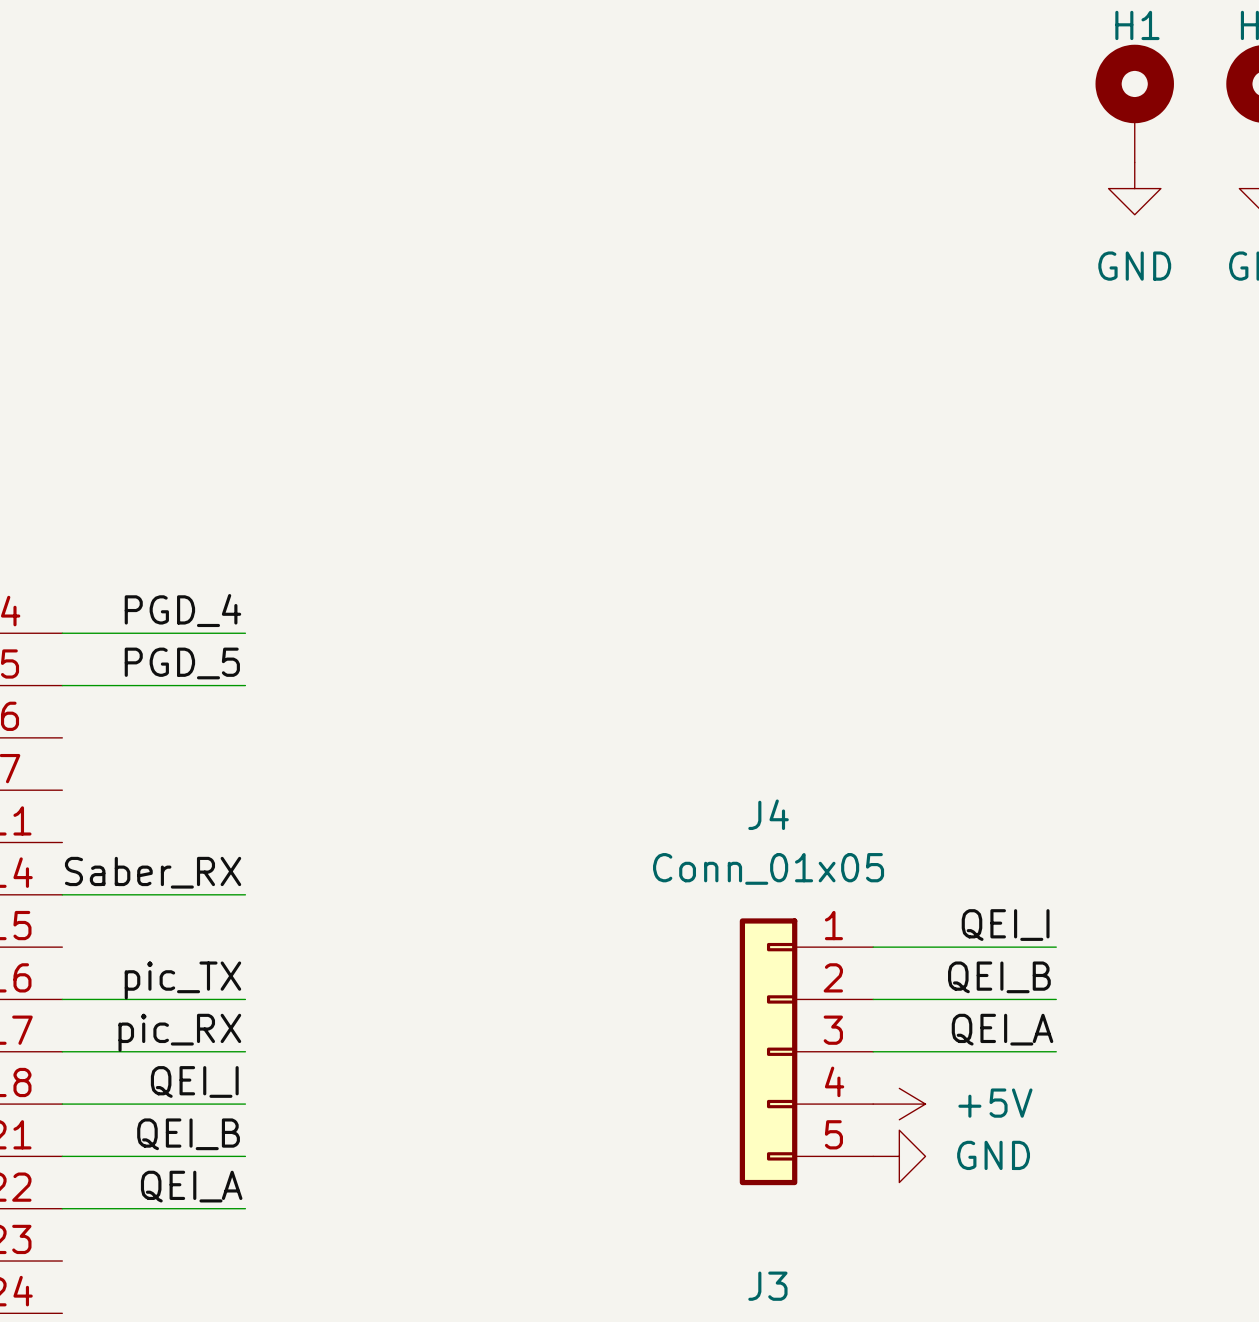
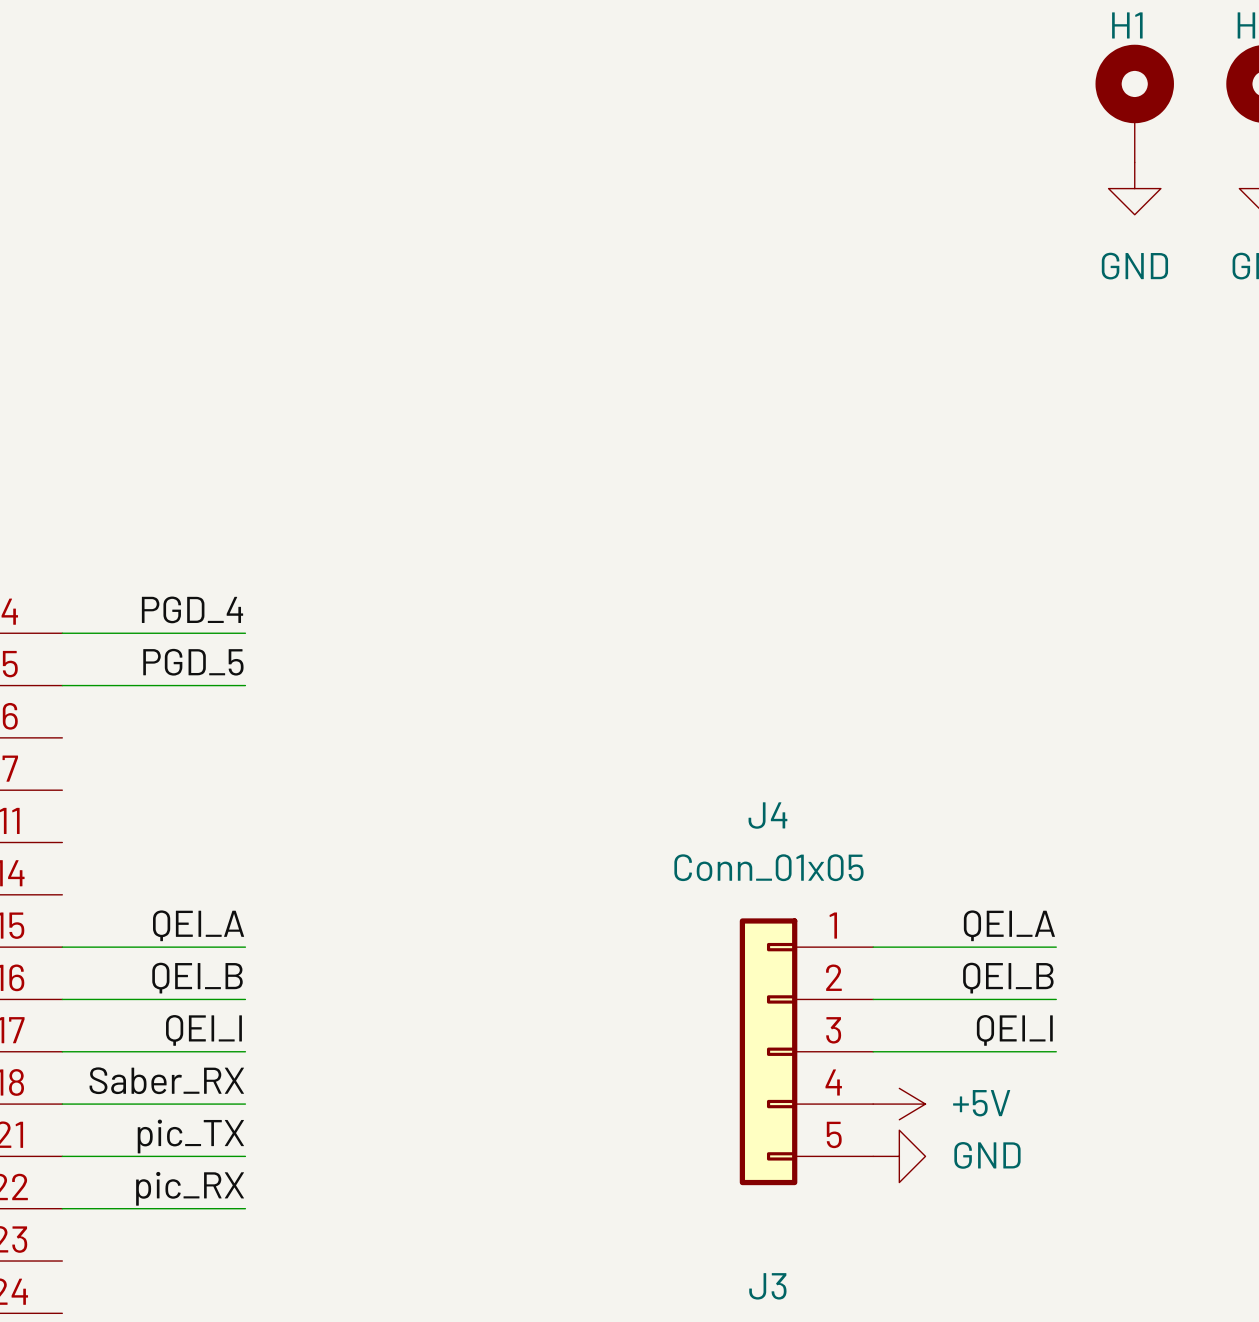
label: Saber_RX (153, 872) -> none
wire: (62, 894) (245, 894) -> (62, 947) (245, 947)
label: none -> QEI_A (198, 925)
label: QEI_I (1005, 925) -> QEI_A (1009, 925)
label: pic_TX (182, 980) -> QEI_B (197, 978)
label: QEI_A (1002, 1029) -> QEI_I (1014, 1030)
label: pic_RX (179, 1032) -> QEI_I (203, 1030)
label: QEI_I (194, 1081) -> Saber_RX (166, 1080)
label: QEI_B (188, 1134) -> pic_TX (190, 1136)
label: QEI_A (191, 1186) -> pic_RX (190, 1188)

